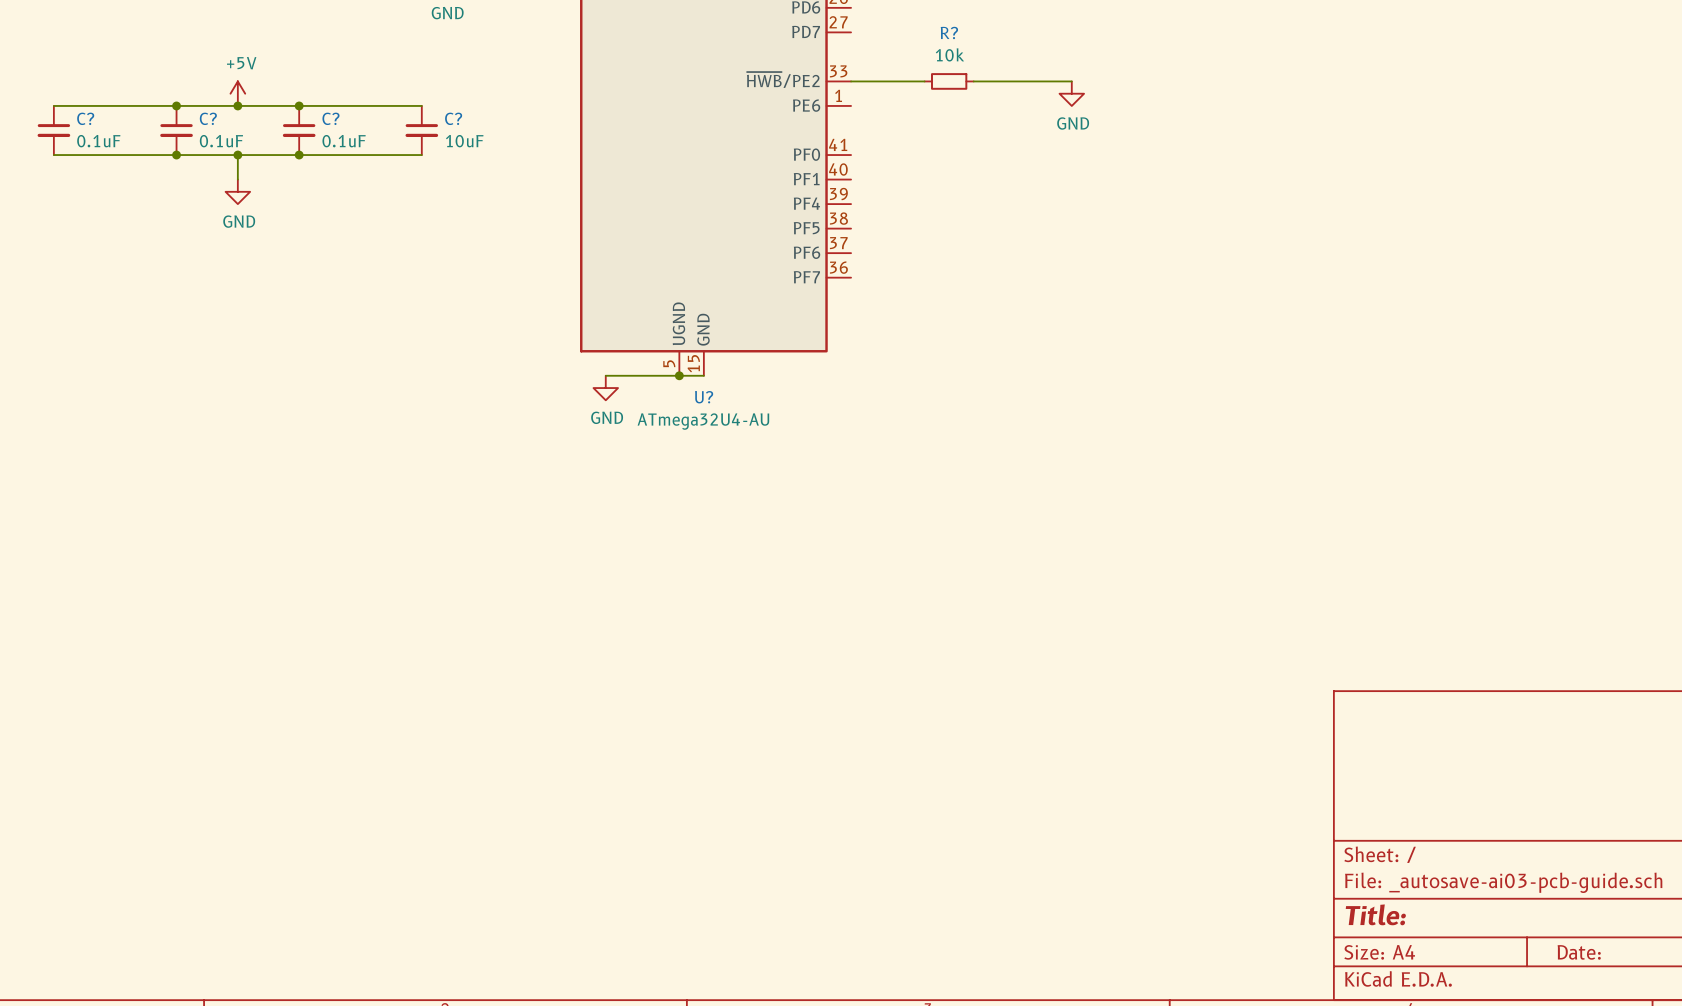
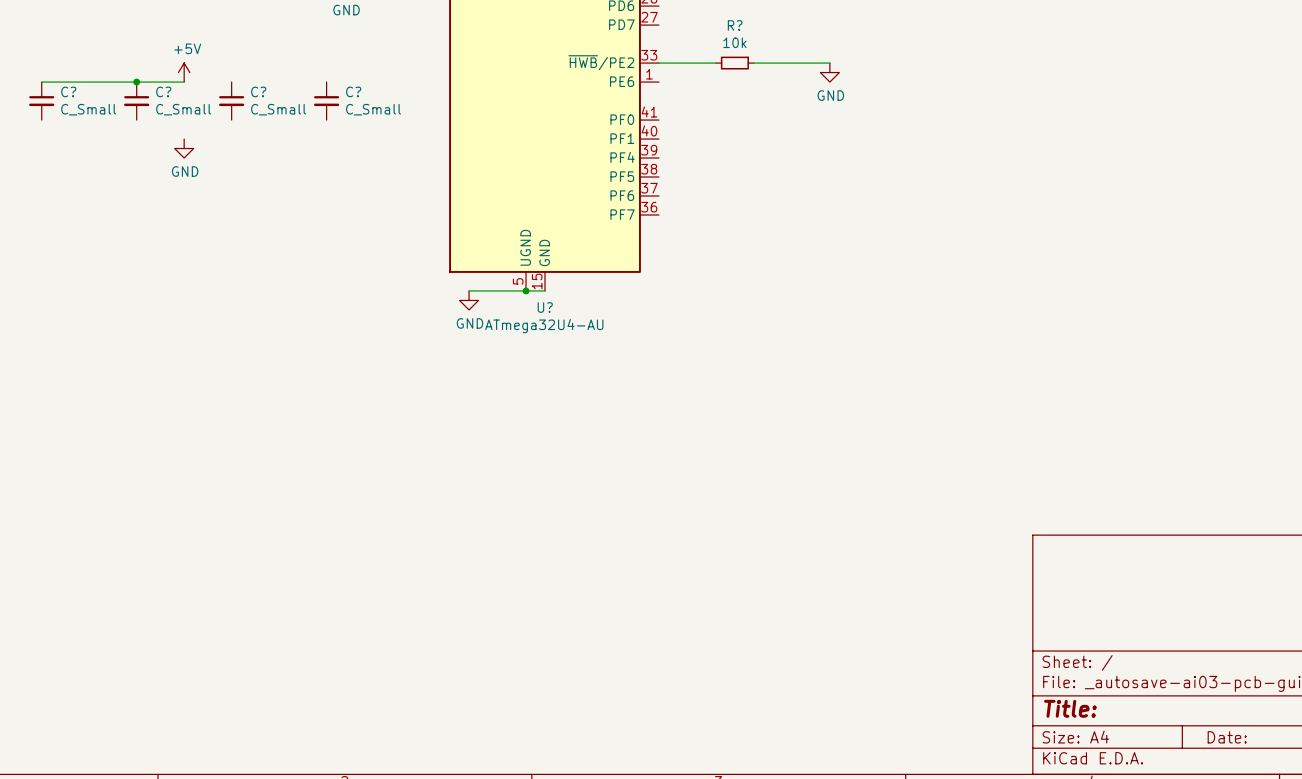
wire: (237, 105) (421, 105) -> none
junction: (237, 105) -> none
junction: (299, 105) -> none
C? value: 0.1uF (98, 141) -> C_Small (88, 109)
C? value: 0.1uF (221, 141) -> C_Small (183, 109)
C? value: 0.1uF (344, 141) -> C_Small (278, 109)
C? value: 10uF (464, 141) -> C_Small (373, 109)
wire: (53, 155) (421, 155) -> none
junction: (176, 155) -> none
wire: (237, 155) (237, 179) -> none
junction: (237, 155) -> none
junction: (299, 155) -> none

